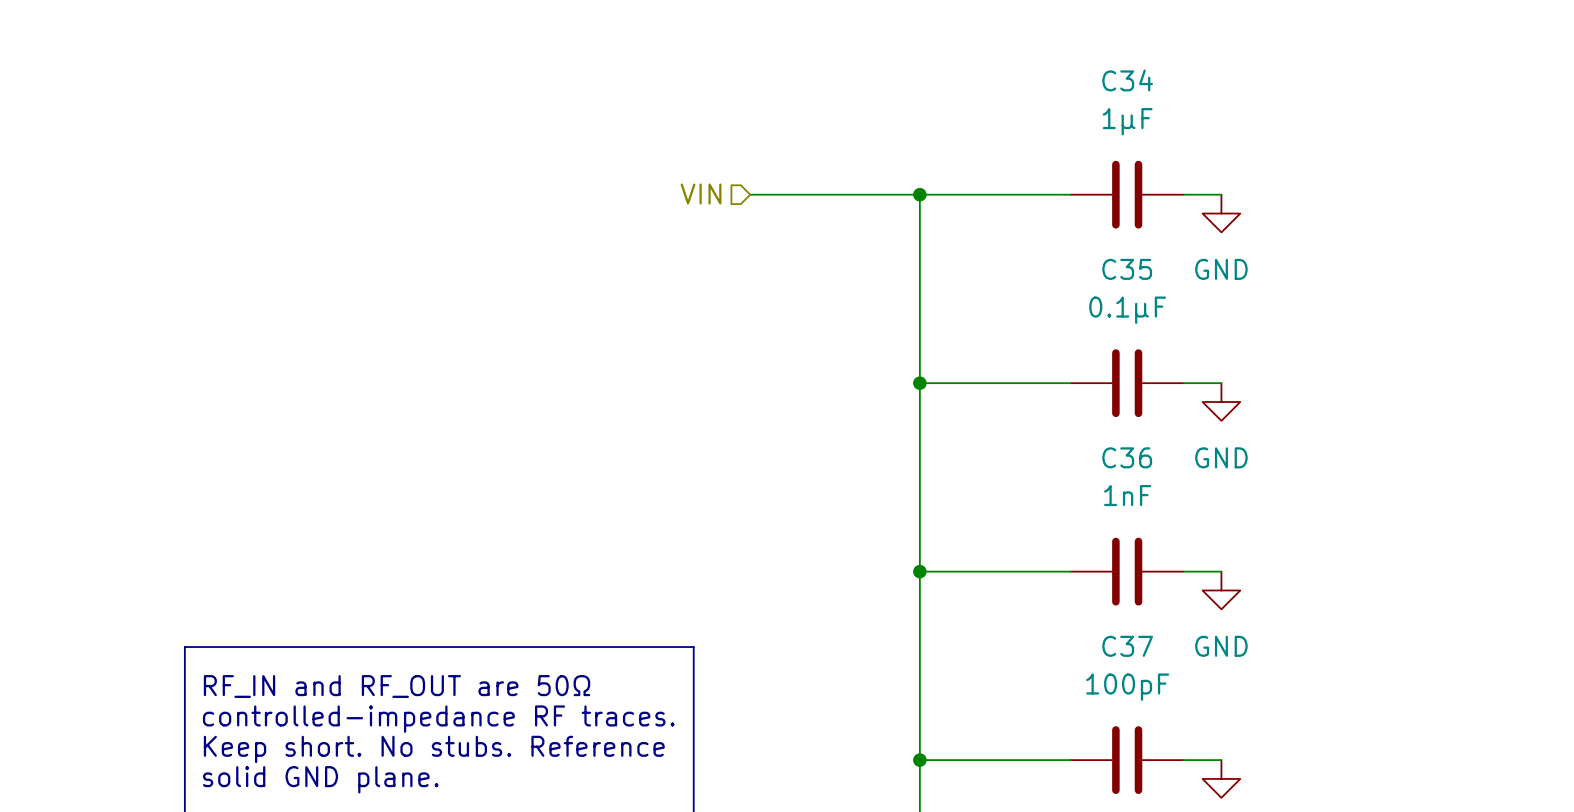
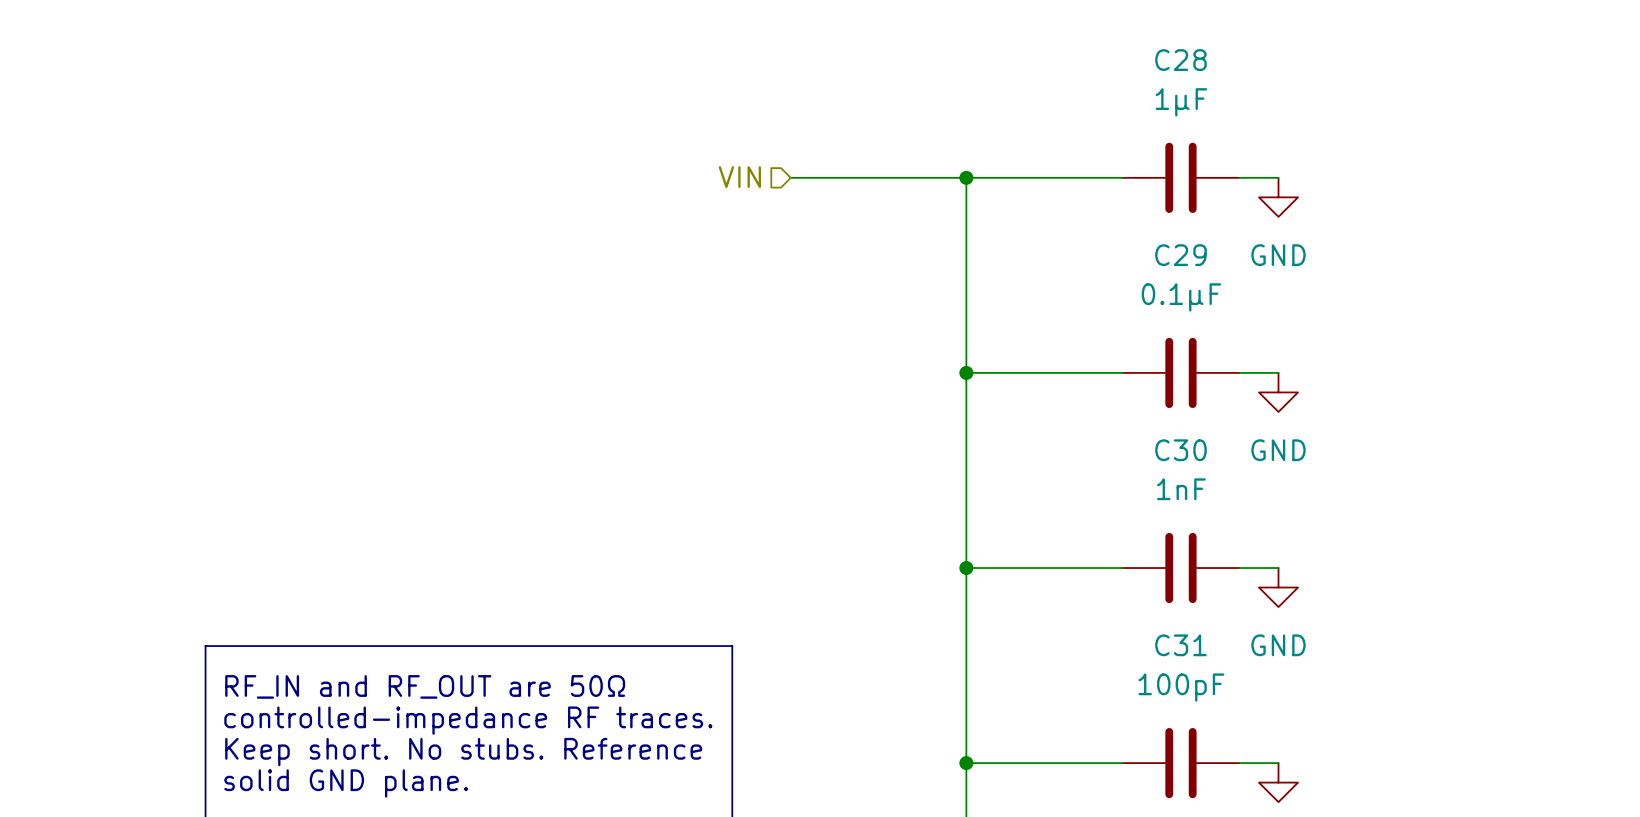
C34 name: C34 (1127, 80) -> C28 (1180, 60)
C35 name: C35 (1127, 269) -> C29 (1180, 255)
C36 name: C36 (1127, 457) -> C30 (1180, 450)
C37 name: C37 (1127, 646) -> C31 (1180, 645)

